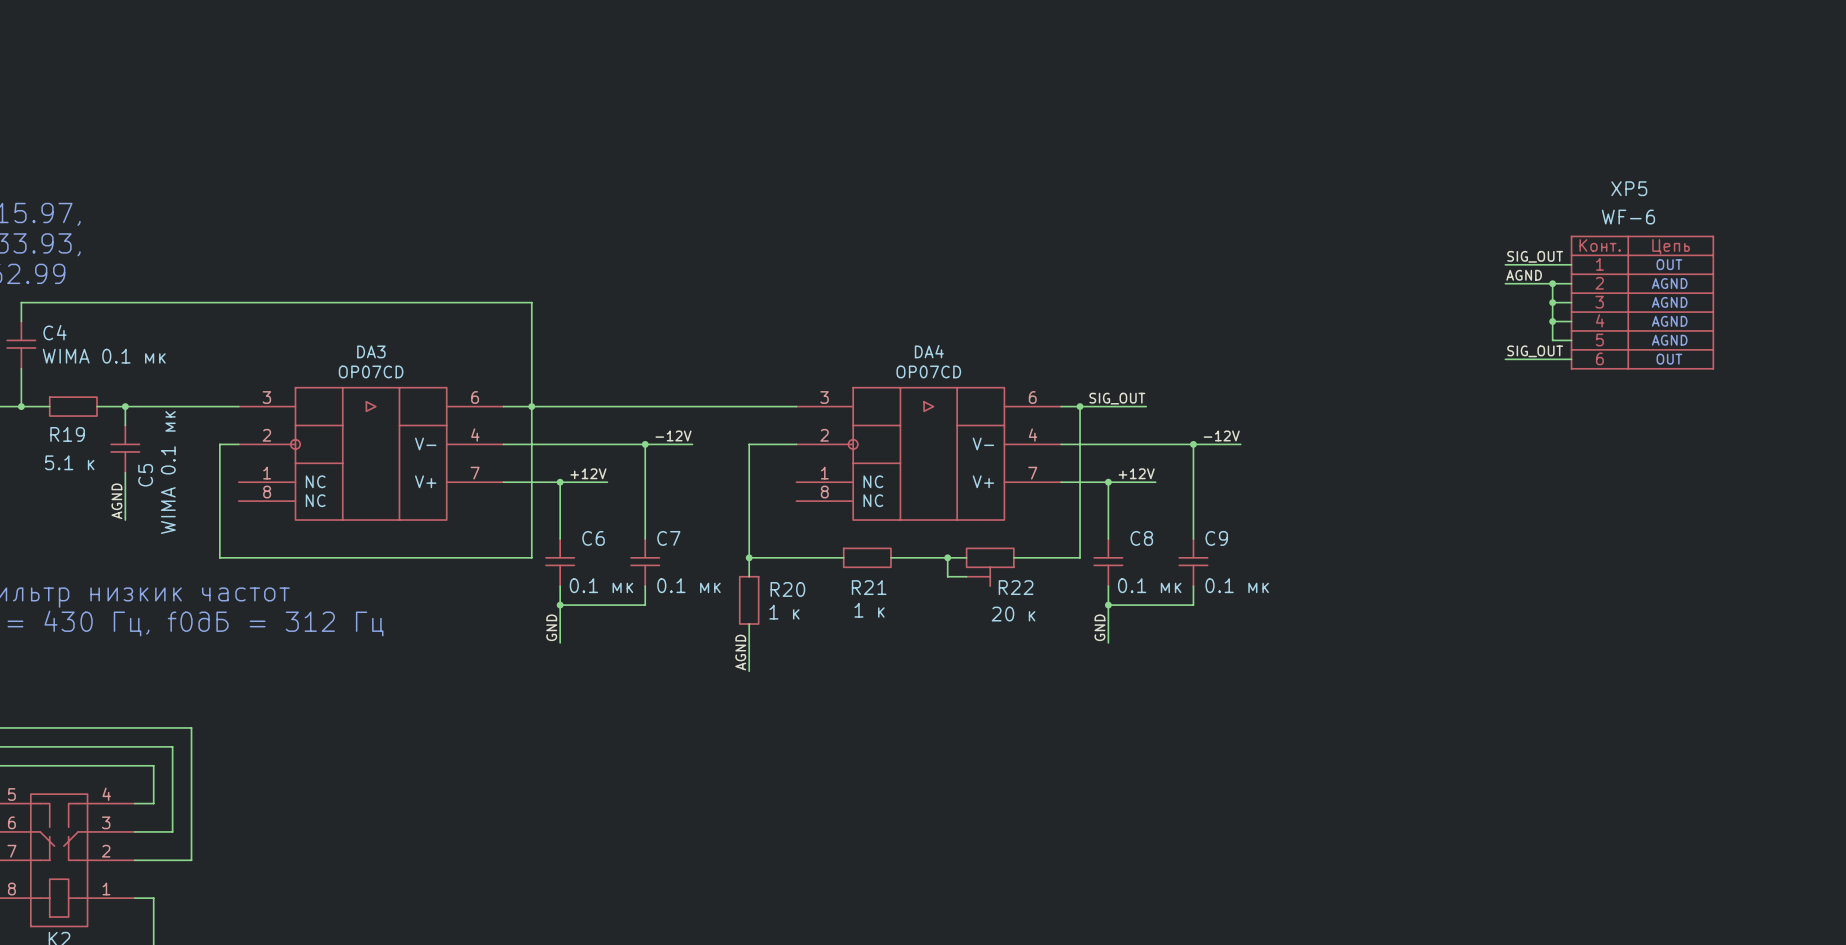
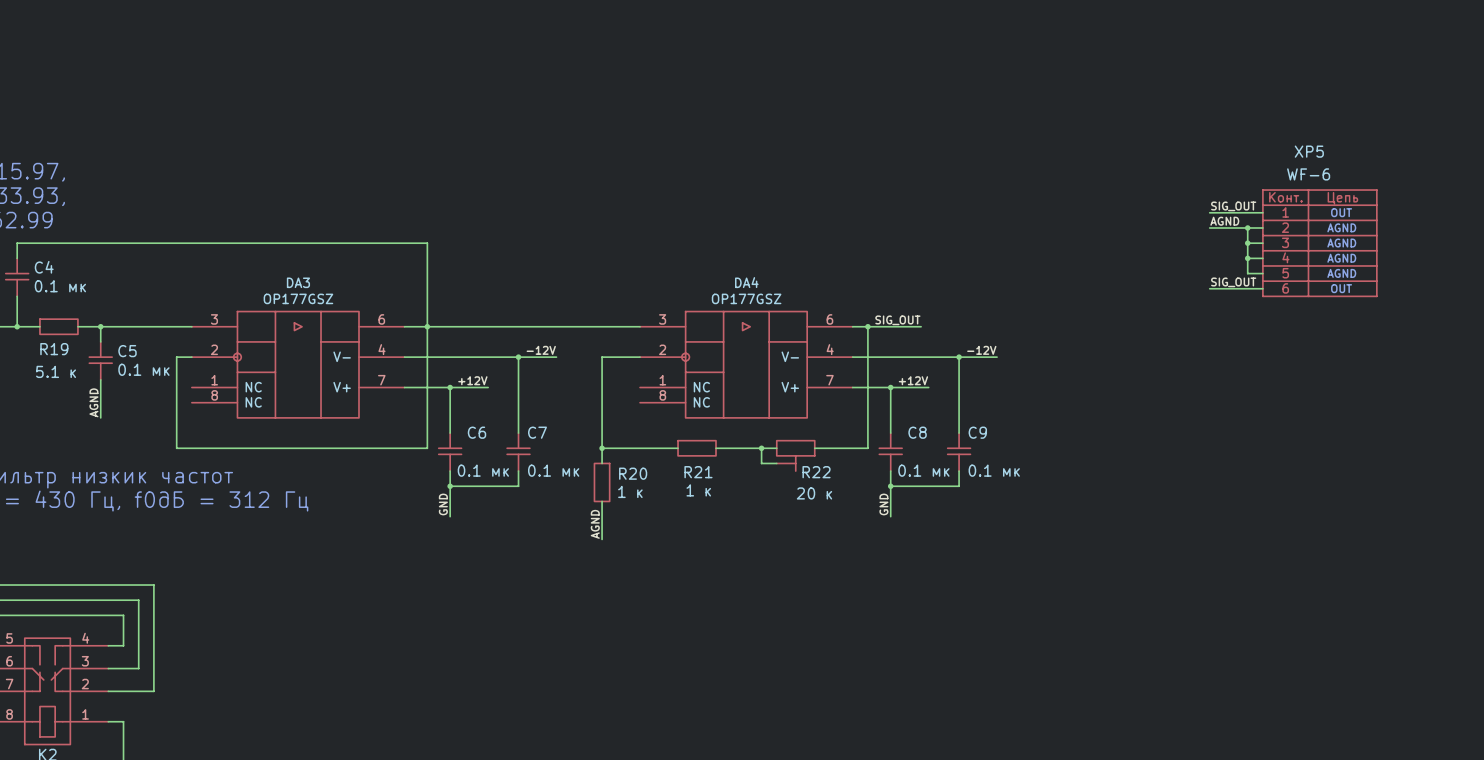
C4 value: WIMA 0.1 мк (104, 356) -> 0.1 мк (60, 286)
DA3 value: OP07CD (371, 371) -> OP177GSZ (298, 298)
DA4 value: OP07CD (928, 371) -> OP177GSZ (746, 298)
C5 value: WIMA 0.1 мк (168, 472) -> 0.1 мк (143, 369)
C5 name rotation: 0° (145, 475) -> 90° clockwise (127, 351)
C5 name position: C5 (145, 475) -> C5 (127, 351)

